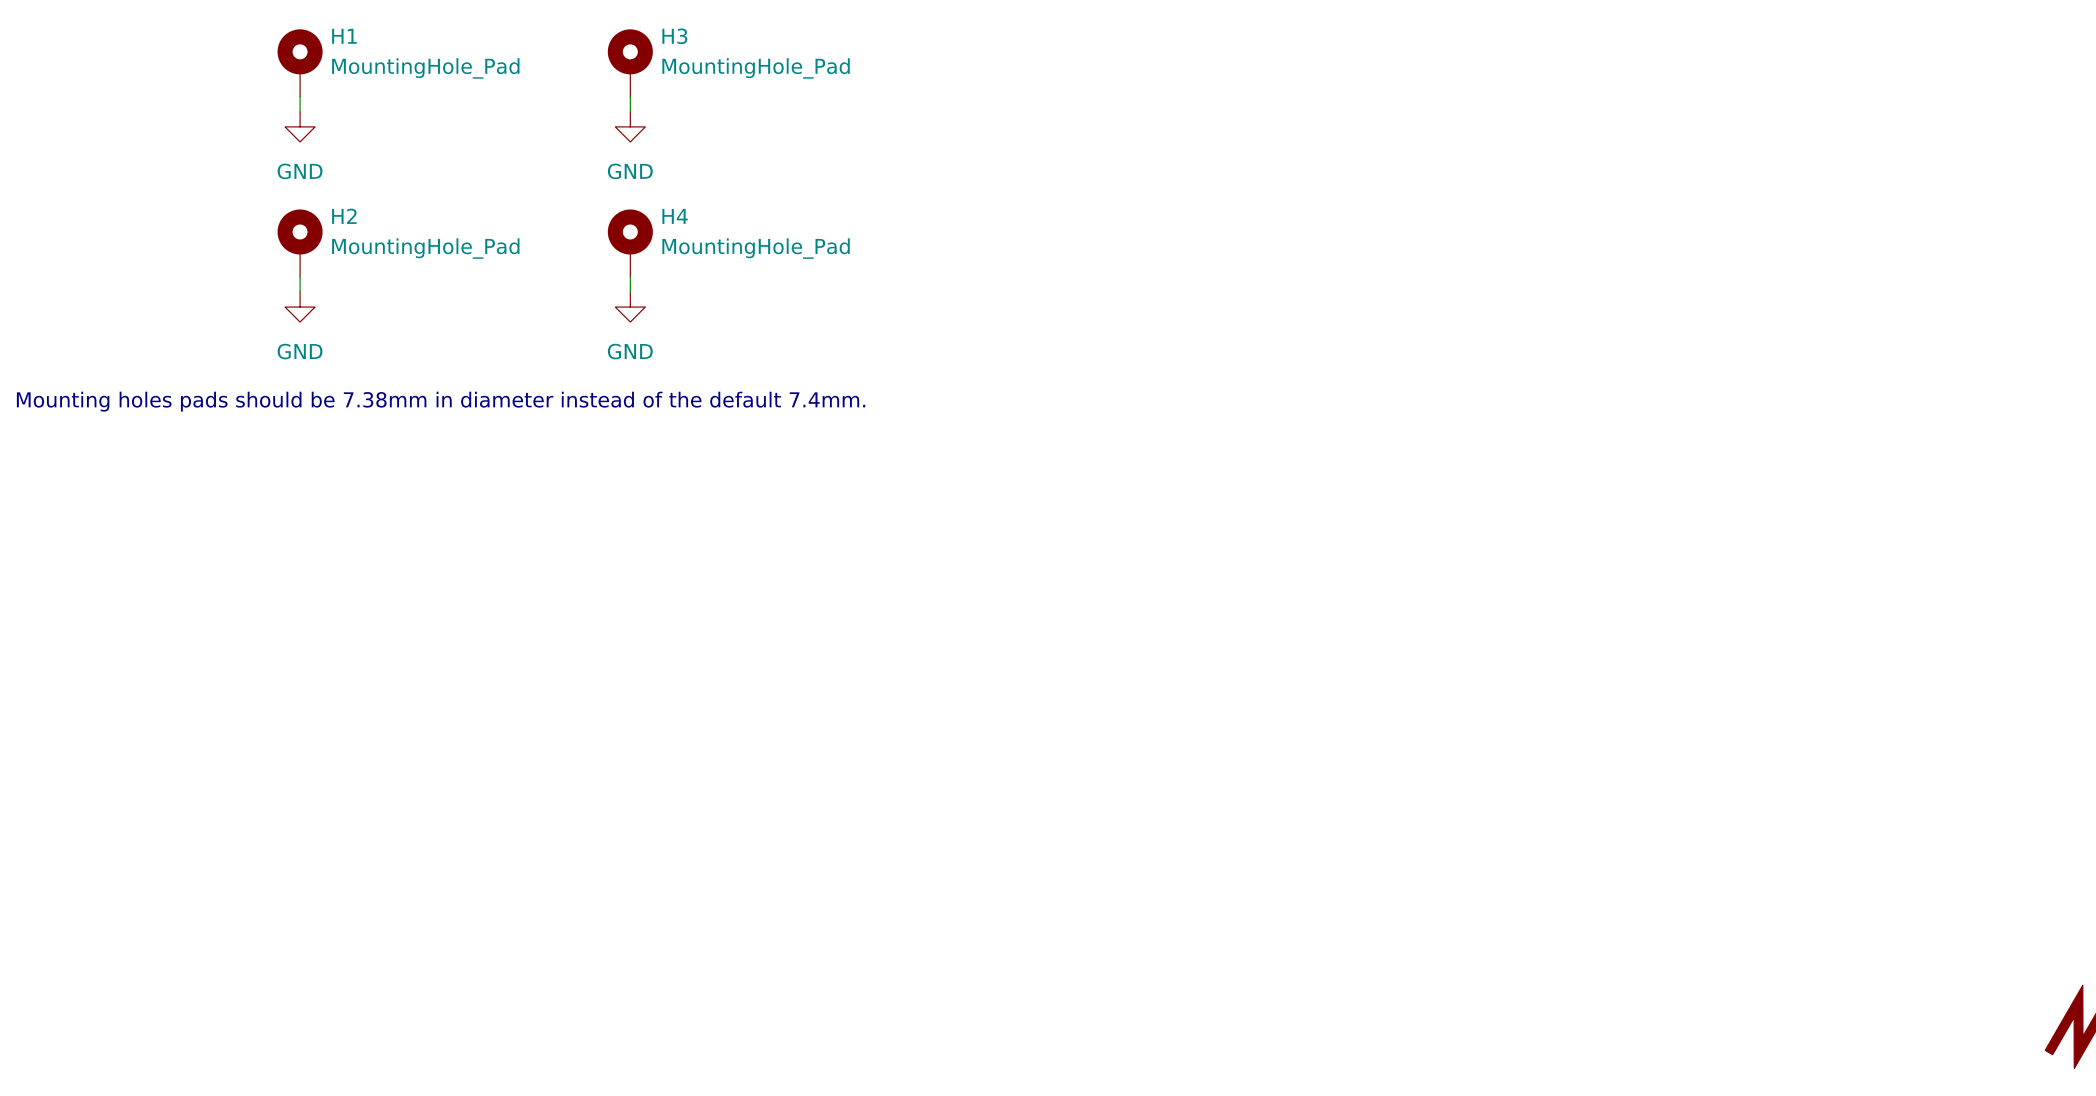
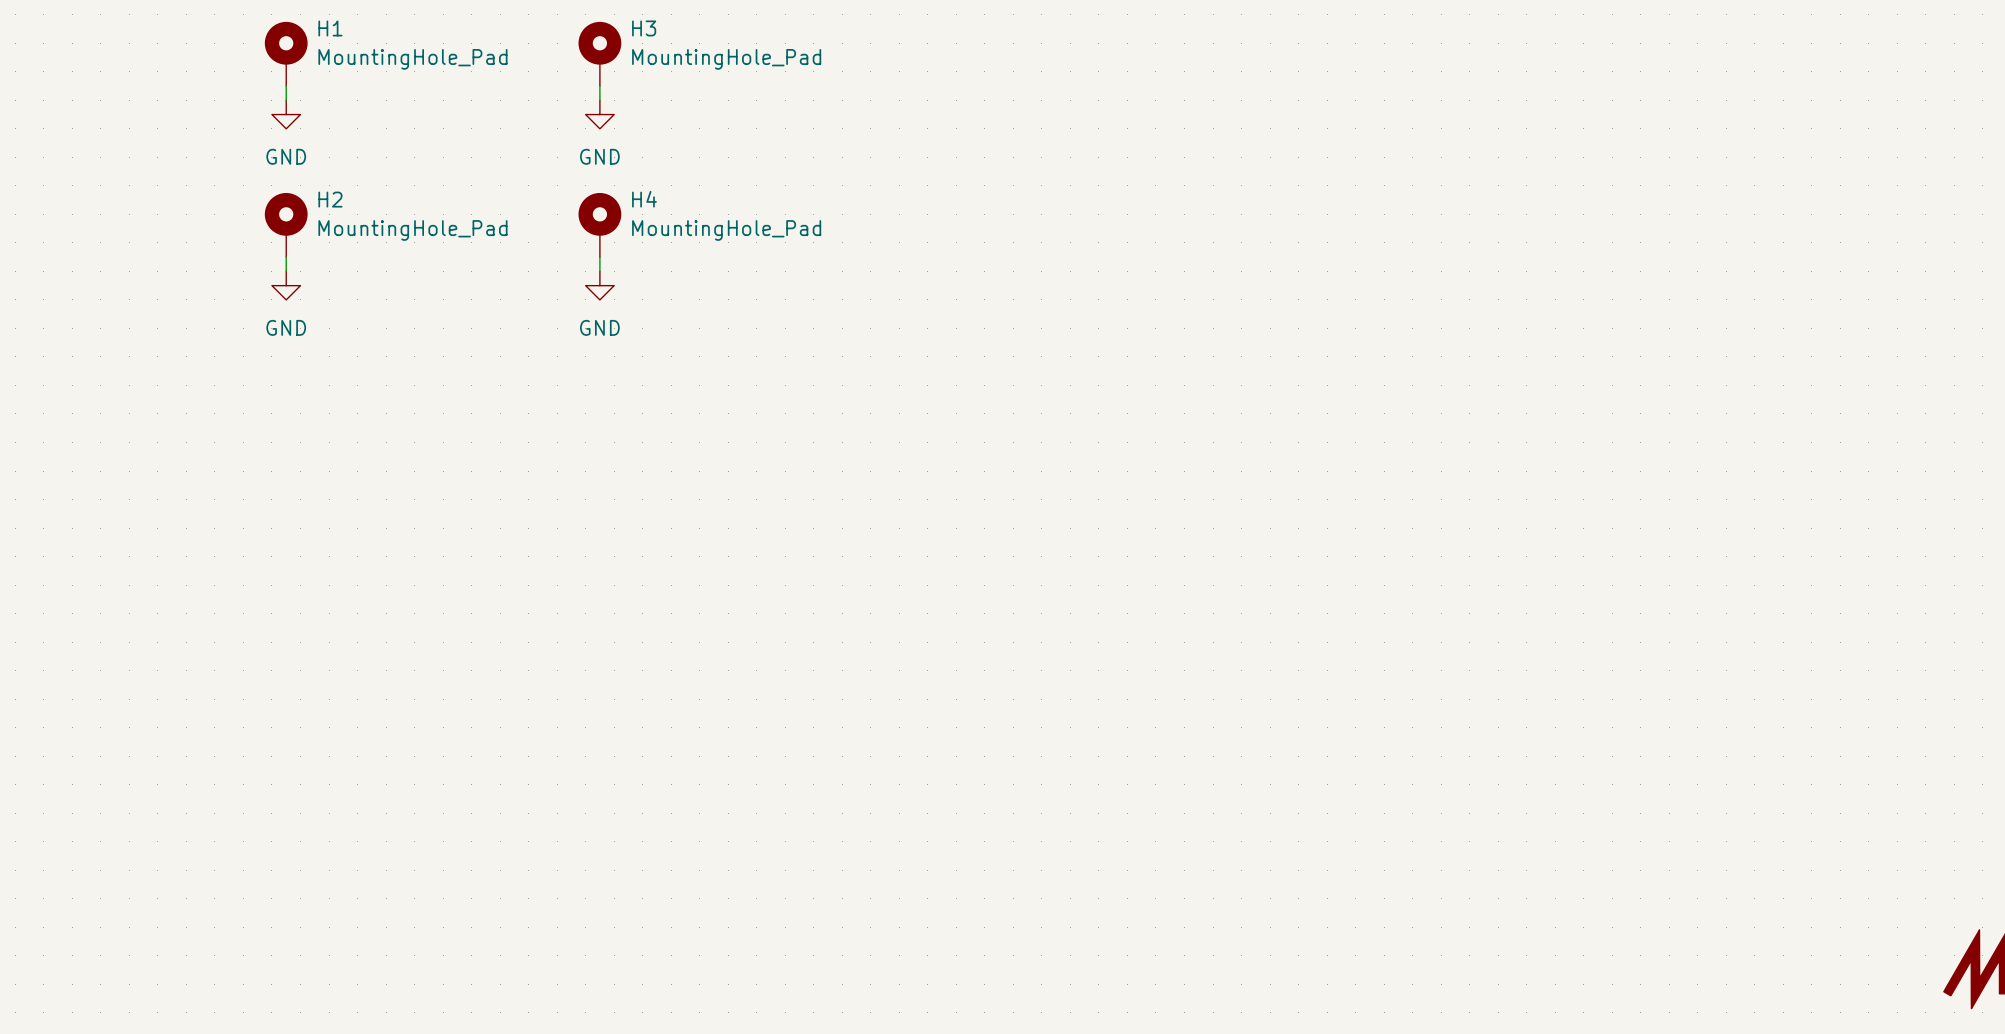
text: Mounting holes pads should be 7.38mm in diameter instead of the default 7.4mm. (441, 401) -> none

